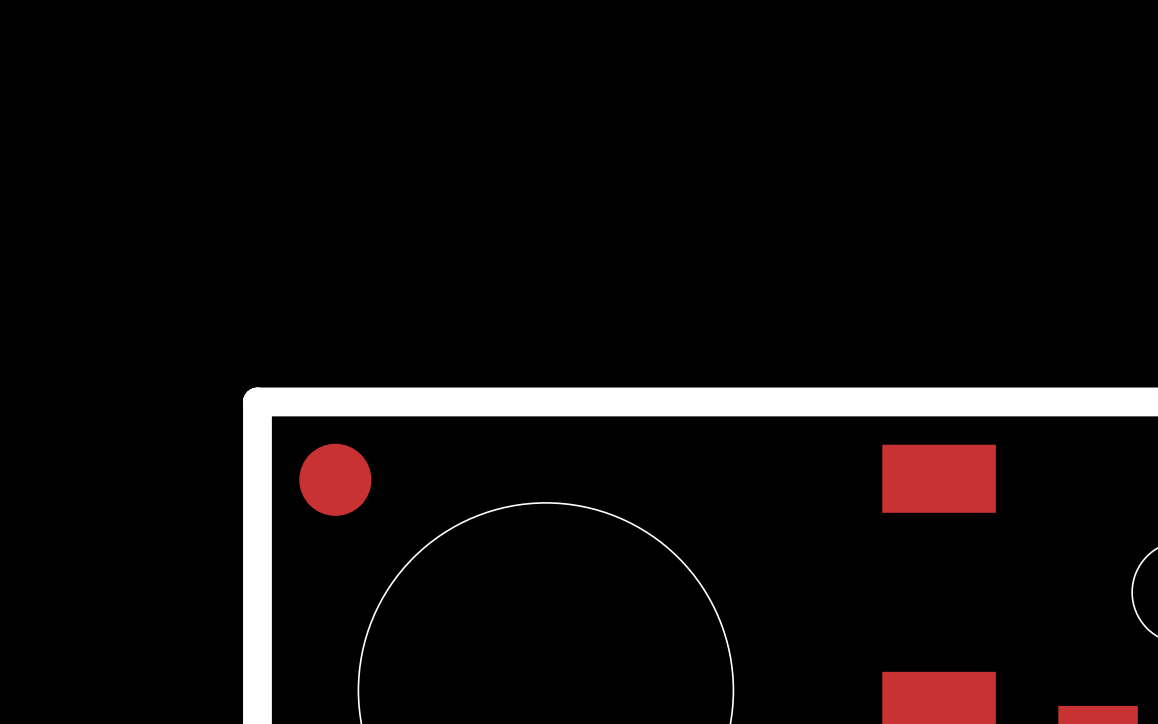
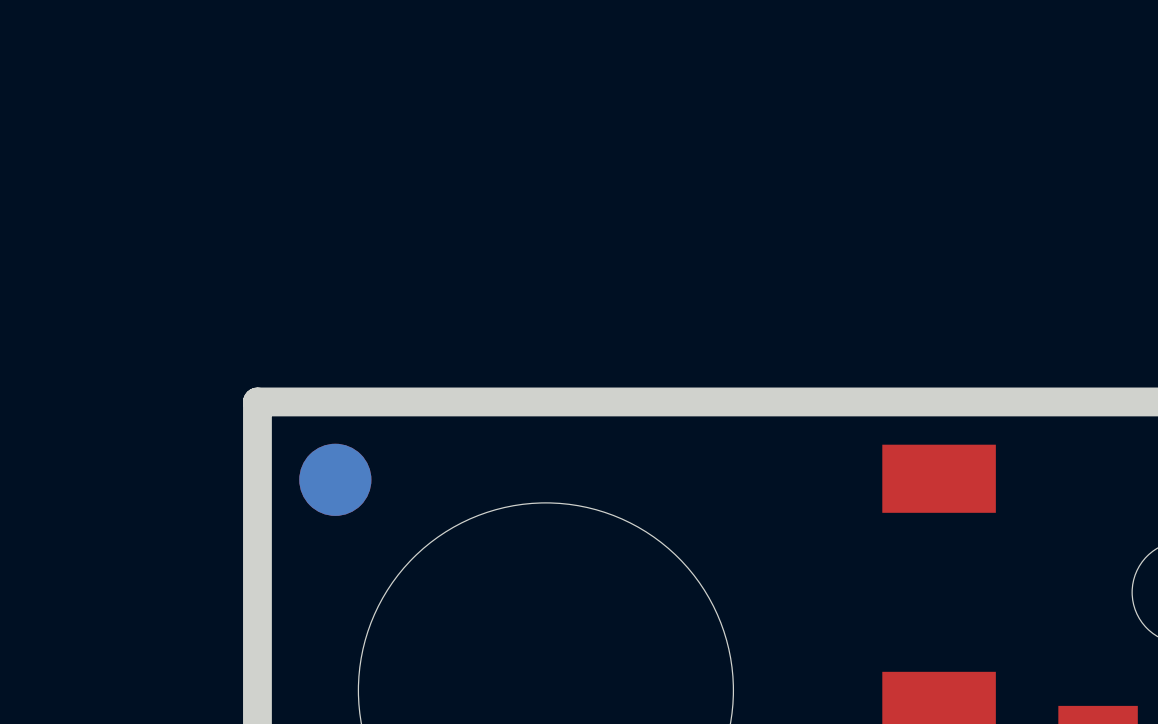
part: none -> (335, 479)

